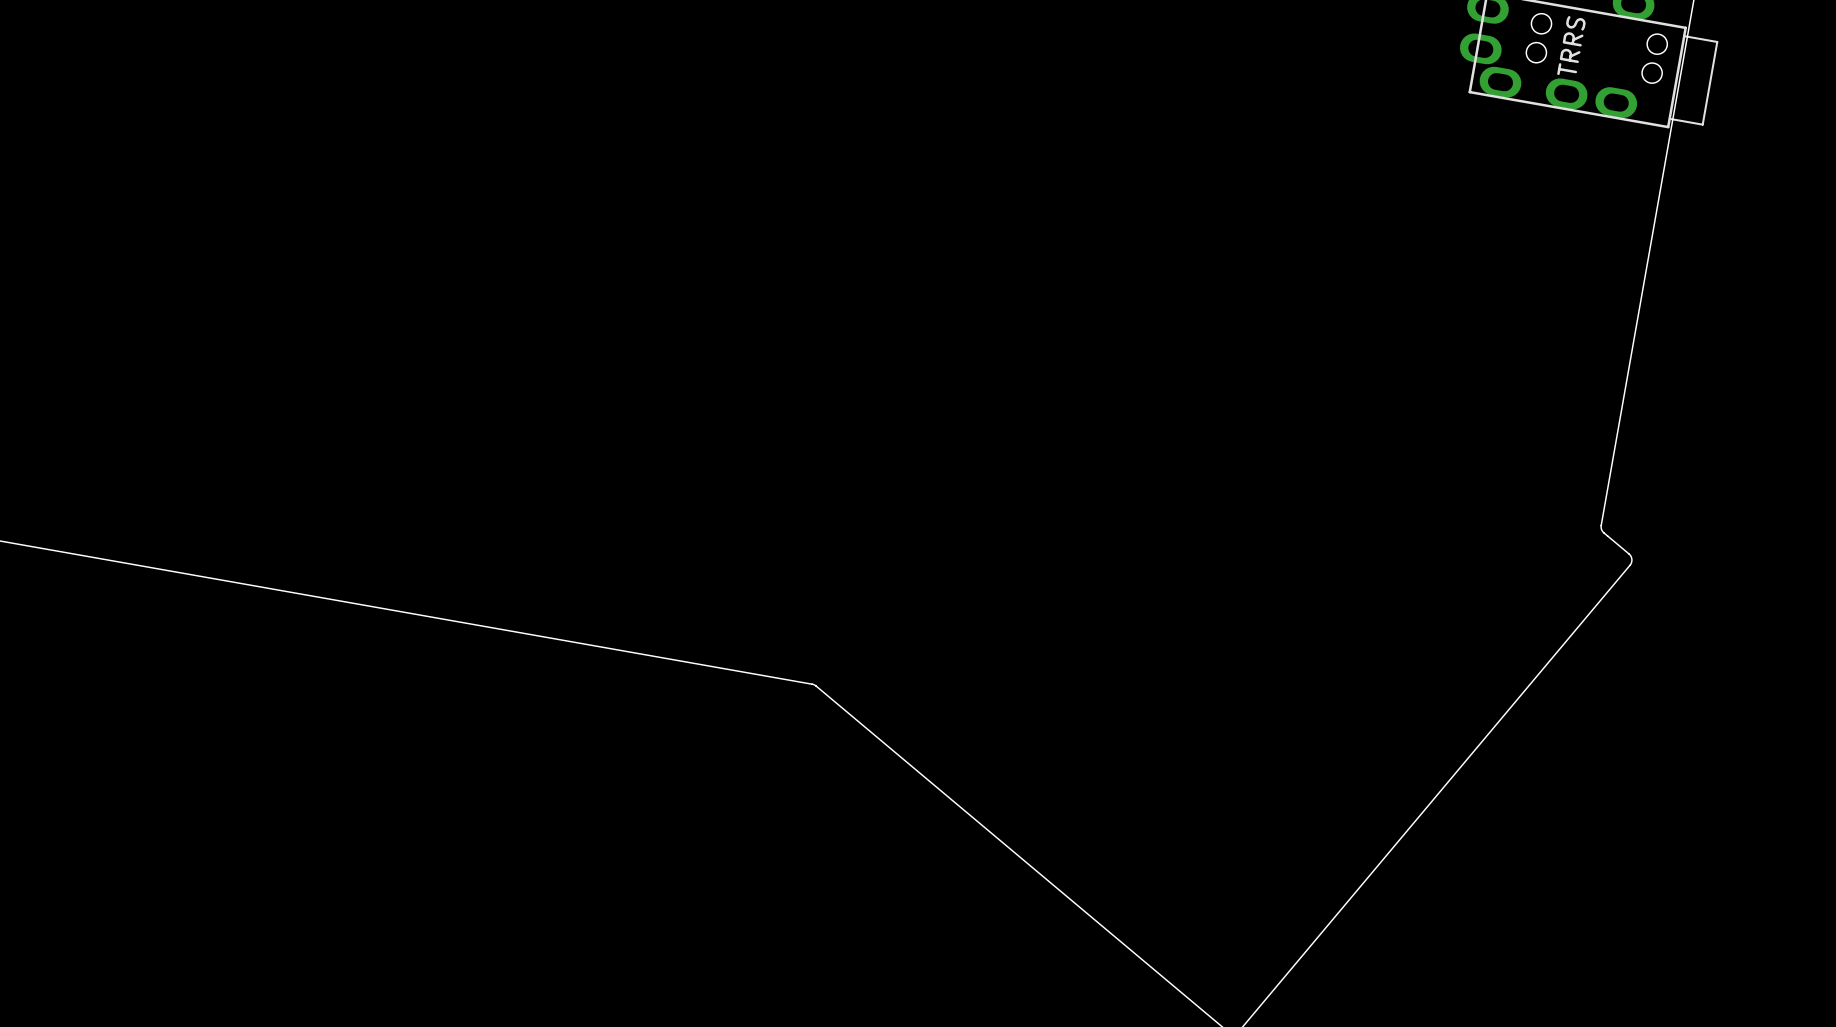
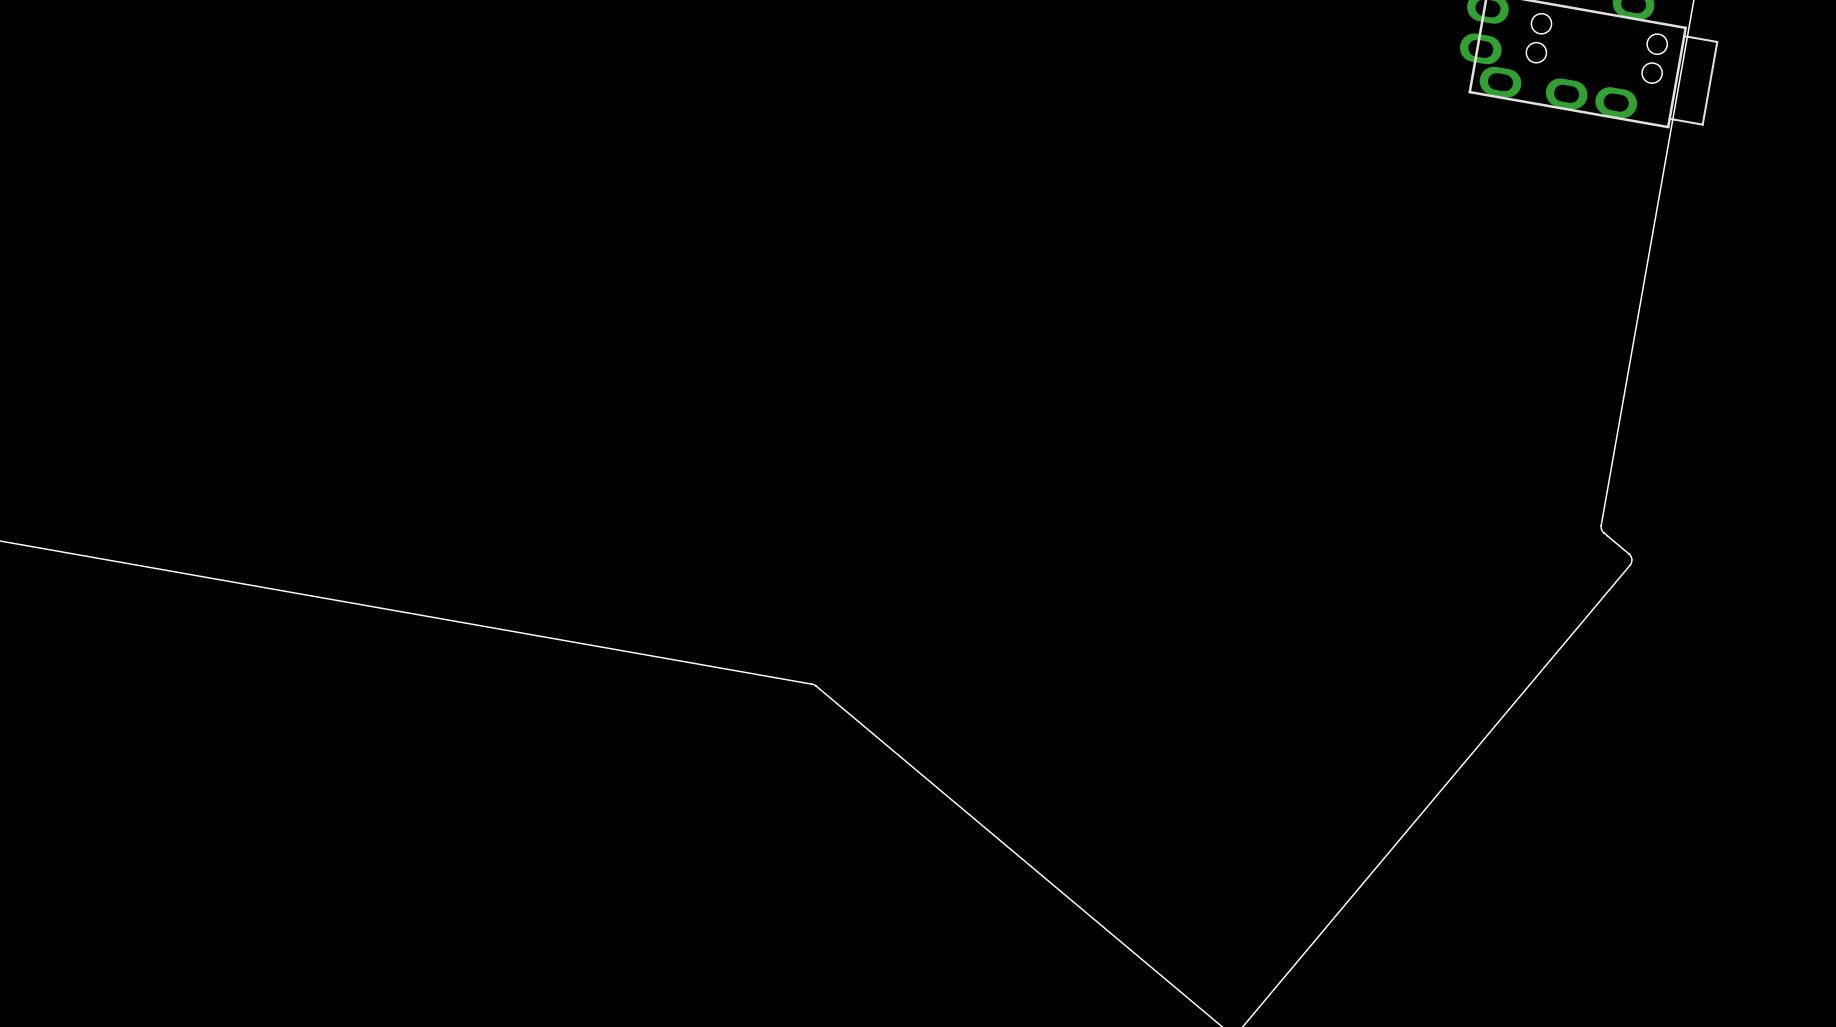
part text: TRRS (1571, 45) -> none

